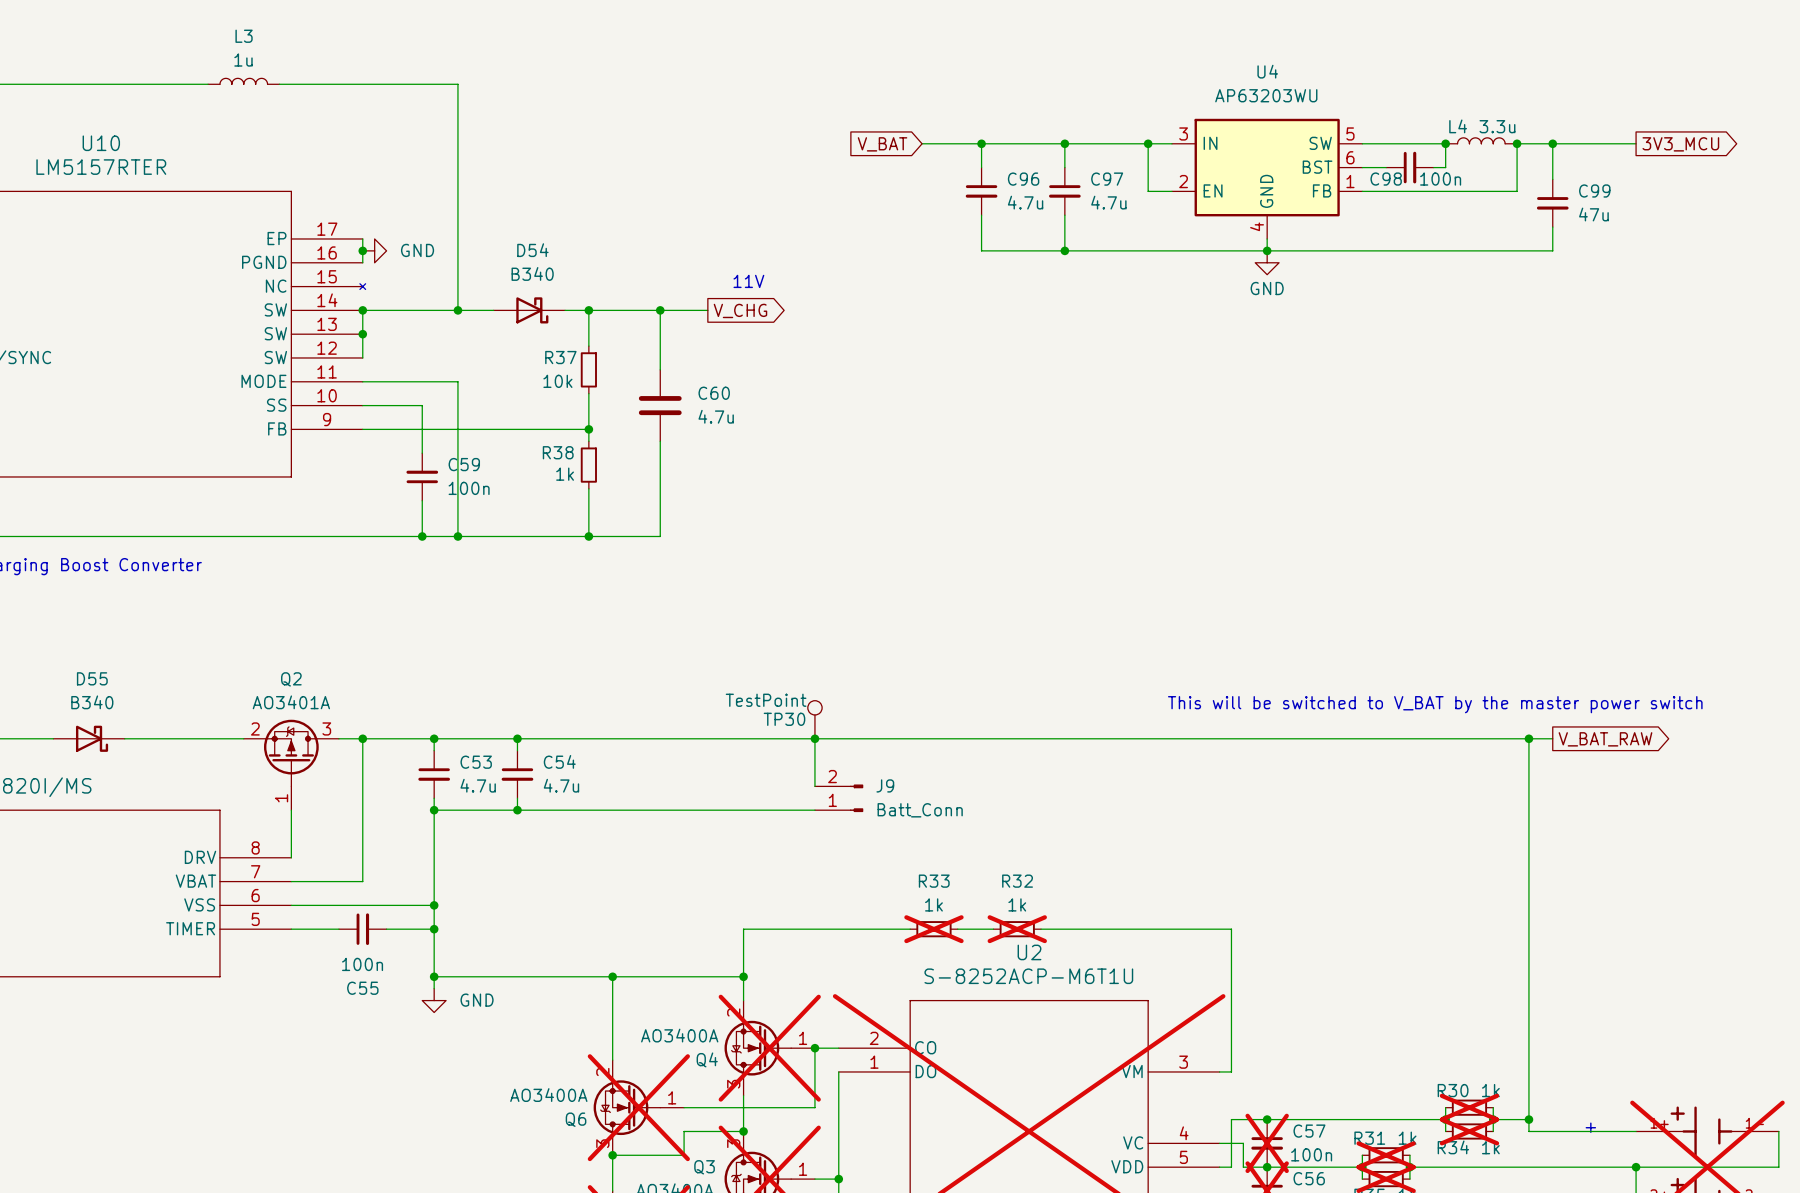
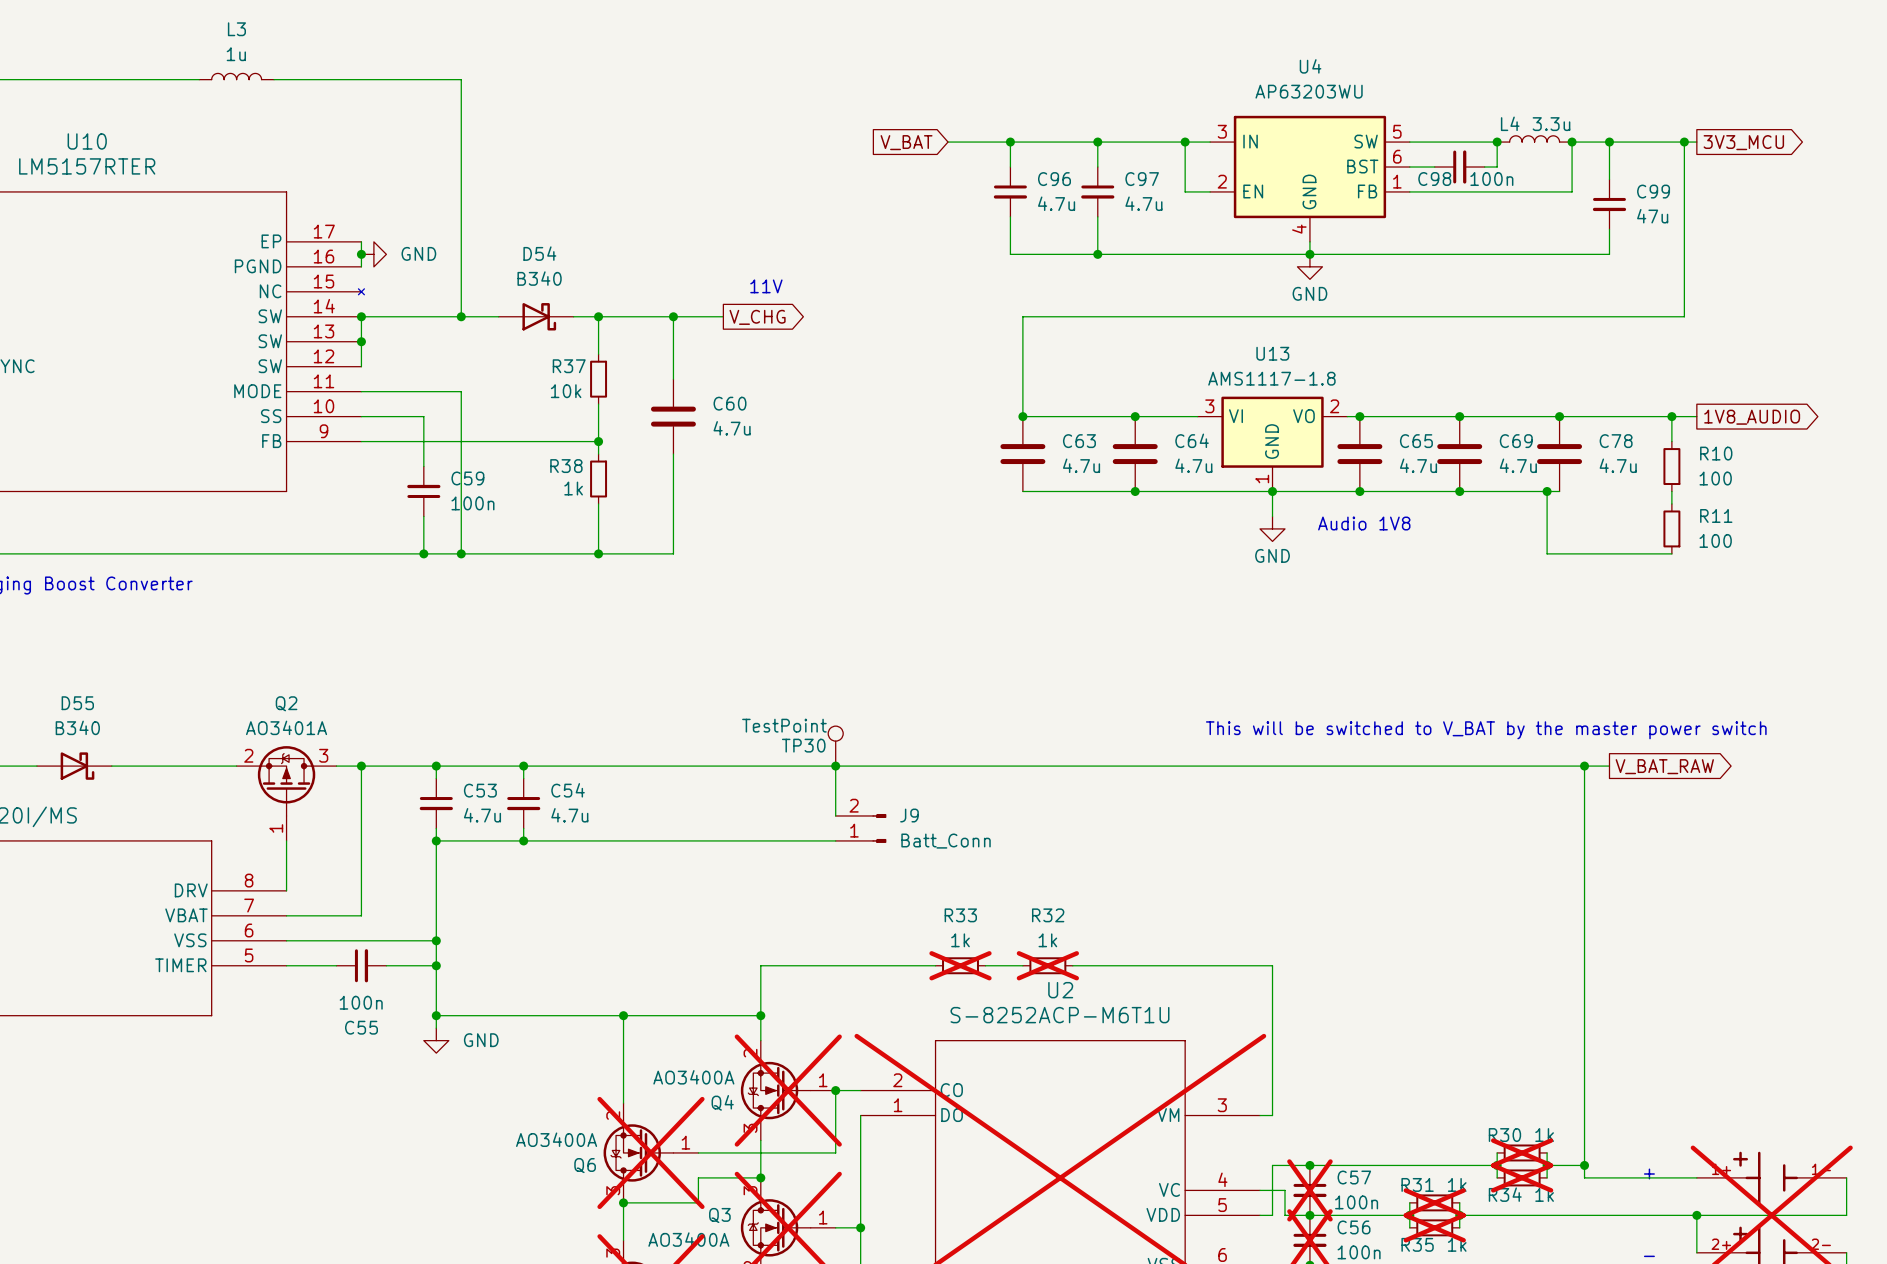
wire: none -> (1684, 142) (1684, 316) (1022, 316) (1022, 416) (1197, 416)
junction: none -> (1684, 142)
junction: none -> (1022, 416)
junction: none -> (1135, 416)
wire: none -> (1347, 416) (1696, 416)
junction: none -> (1359, 416)
junction: none -> (1459, 416)
junction: none -> (1559, 416)
wire: none -> (1671, 416) (1671, 441)
junction: none -> (1671, 416)
global label: none -> 1V8_AUDIO (1752, 417)
U13: none -> AMS1117-1.8 (1272, 444)
C63: none -> 4.7u (1022, 454)
C64: none -> 4.7u (1135, 454)
C65: none -> 4.7u (1359, 454)
C69: none -> 4.7u (1459, 454)
C78: none -> 4.7u (1559, 454)
R10: none -> 100 (1671, 466)
wire: none -> (1022, 491) (1559, 491)
junction: none -> (1135, 491)
wire: none -> (1272, 491) (1272, 516)
junction: none -> (1272, 491)
junction: none -> (1359, 491)
junction: none -> (1459, 491)
wire: none -> (1547, 491) (1547, 553) (1671, 553)
junction: none -> (1547, 491)
wire: none -> (1671, 491) (1671, 503)
text: none -> Audio 1V8 (1364, 523)
power symbol: none -> GND (1272, 528)
R11: none -> 100 (1671, 528)

